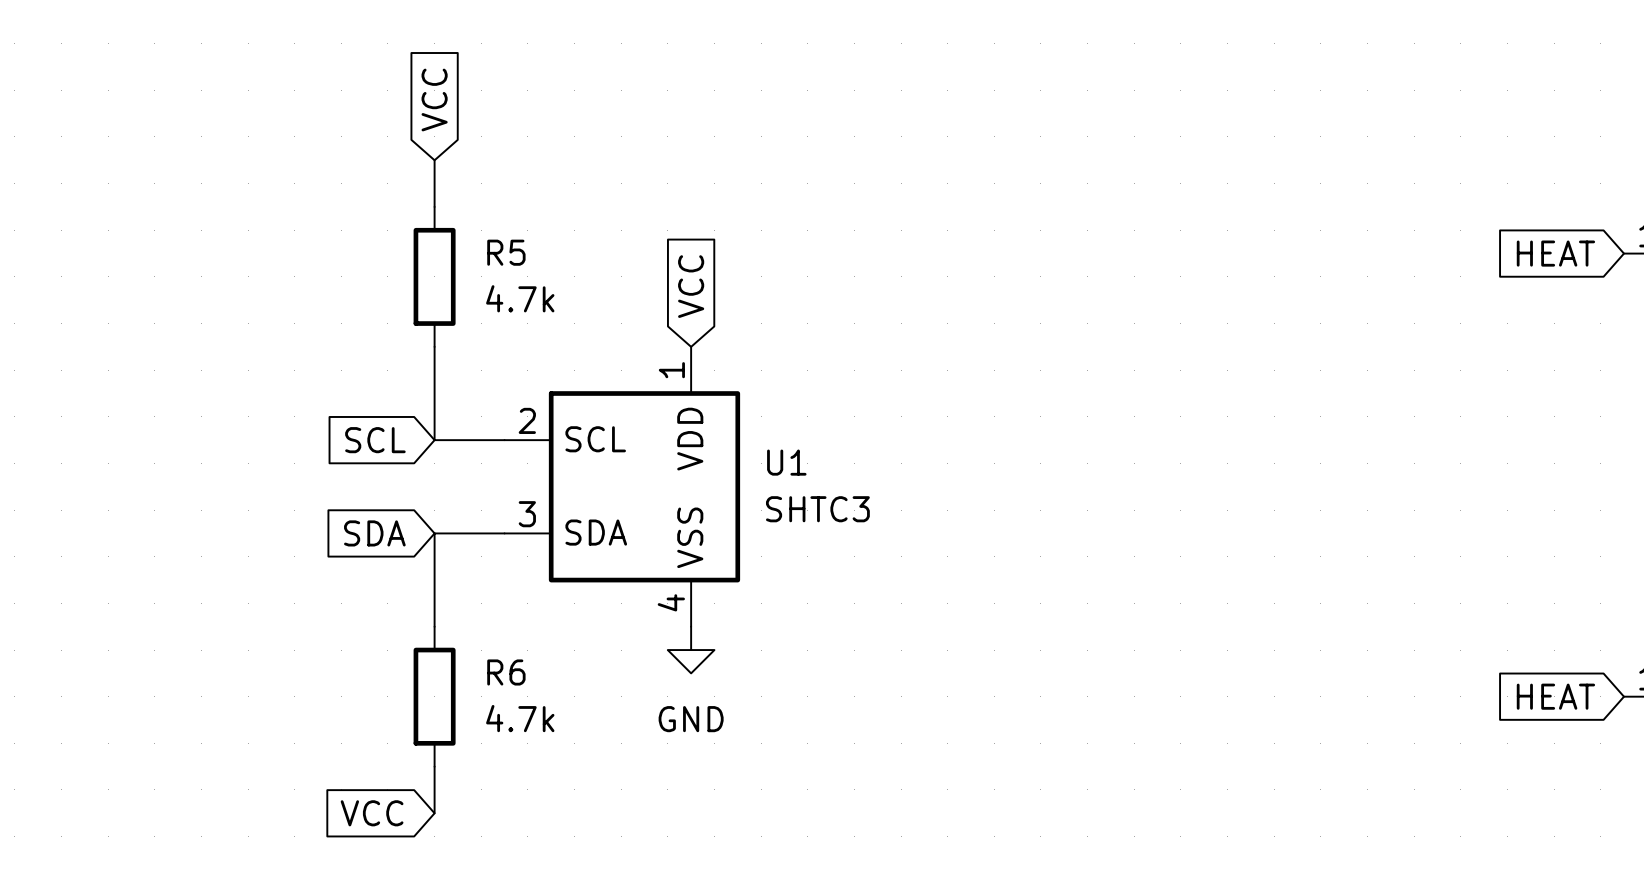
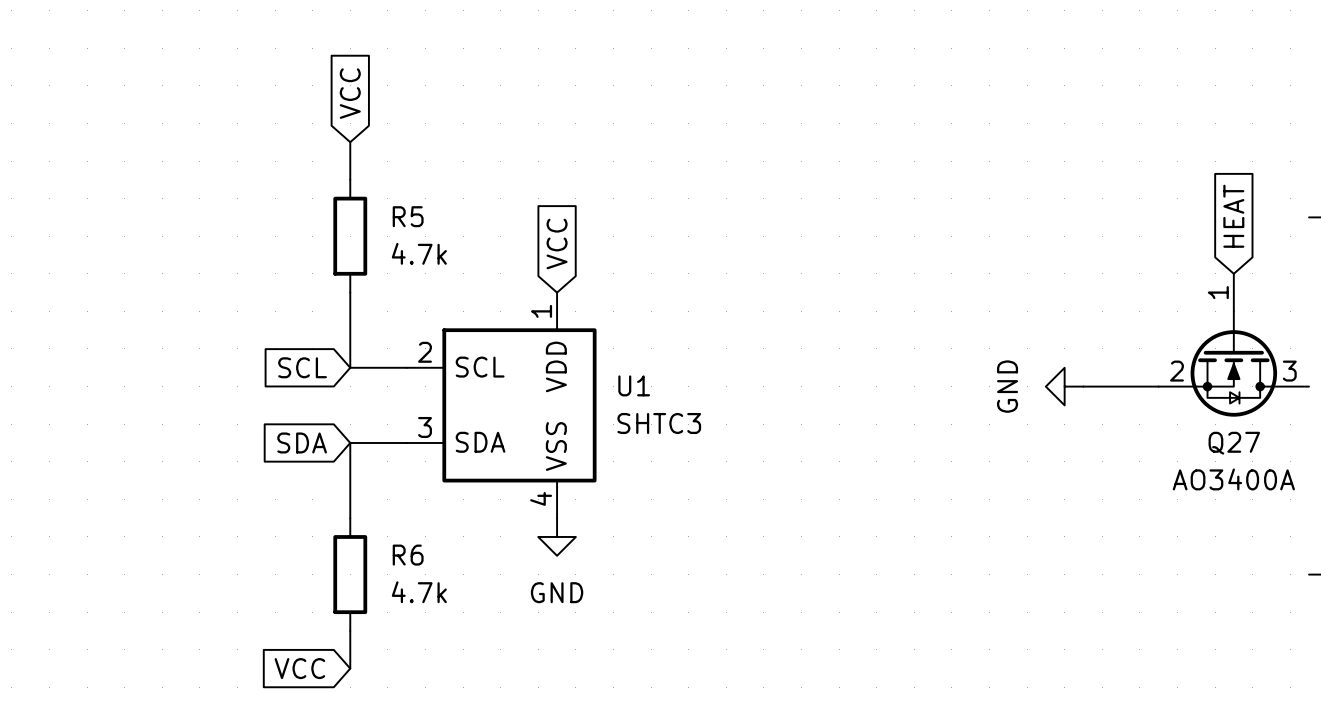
global label rotation: 0° (1555, 253) -> 90° clockwise (1233, 216)
Q27: none -> AO3400A (1233, 345)
power symbol: none -> GND (1064, 386)
wire: none -> (1083, 386) (1158, 386)
global label: HEAT (1555, 696) -> none

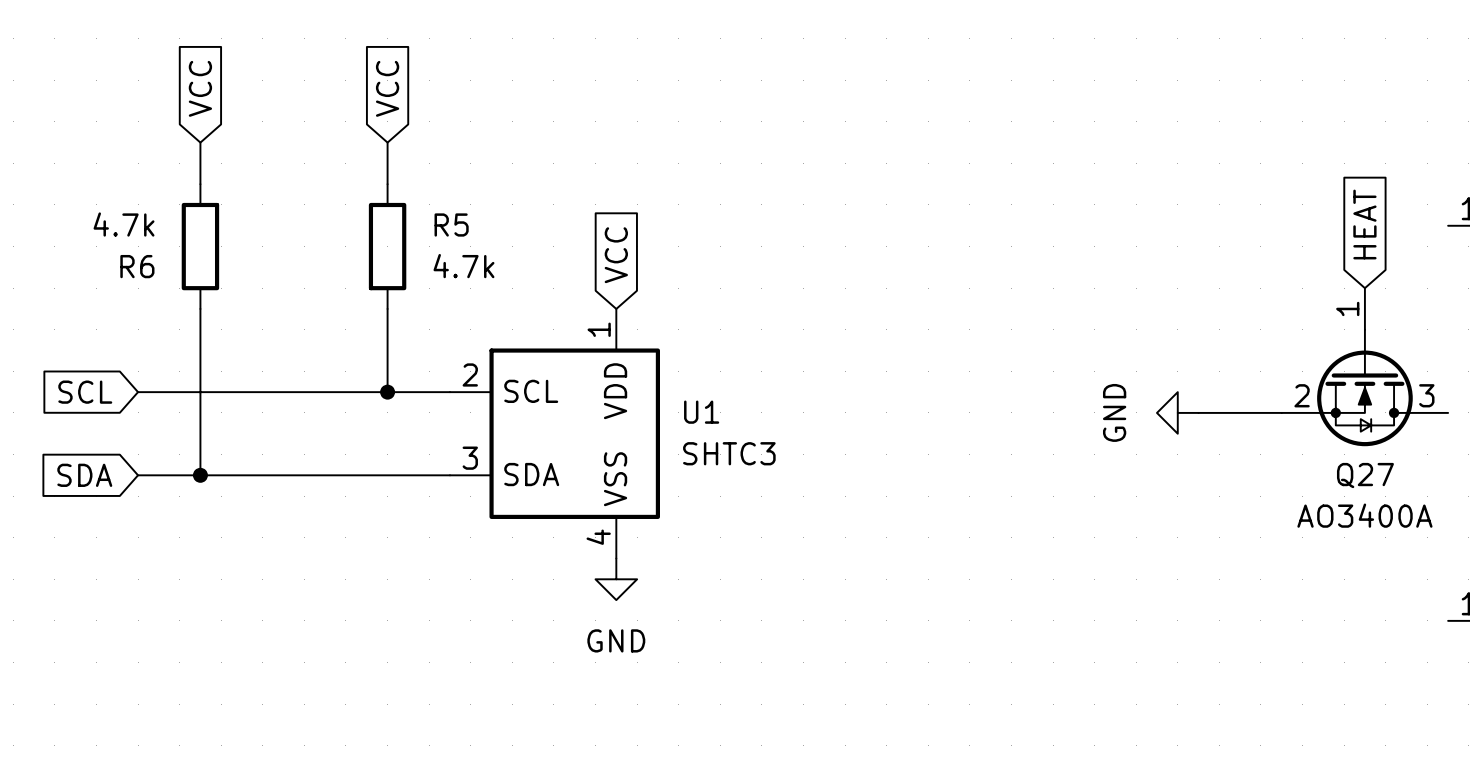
global label: none -> VCC (200, 88)
wire: none -> (200, 142) (200, 184)
wire: none -> (200, 308) (200, 475)
wire: none -> (138, 392) (387, 392)
global label position: SCL (302, 367) -> SCL (85, 392)
junction: none -> (387, 392)
junction: none -> (200, 475)
global label position: SDA (302, 442) -> SDA (84, 475)
wire: (350, 442) (350, 518) -> (387, 475) (138, 475)
R6 name position: R6 (408, 555) -> R6 (137, 266)
R6 position: (350, 574) -> (200, 246)
R6 value position: 4.7k (419, 592) -> 4.7k (124, 224)
wire: (350, 630) (350, 668) -> none
global label: VCC (299, 668) -> none

